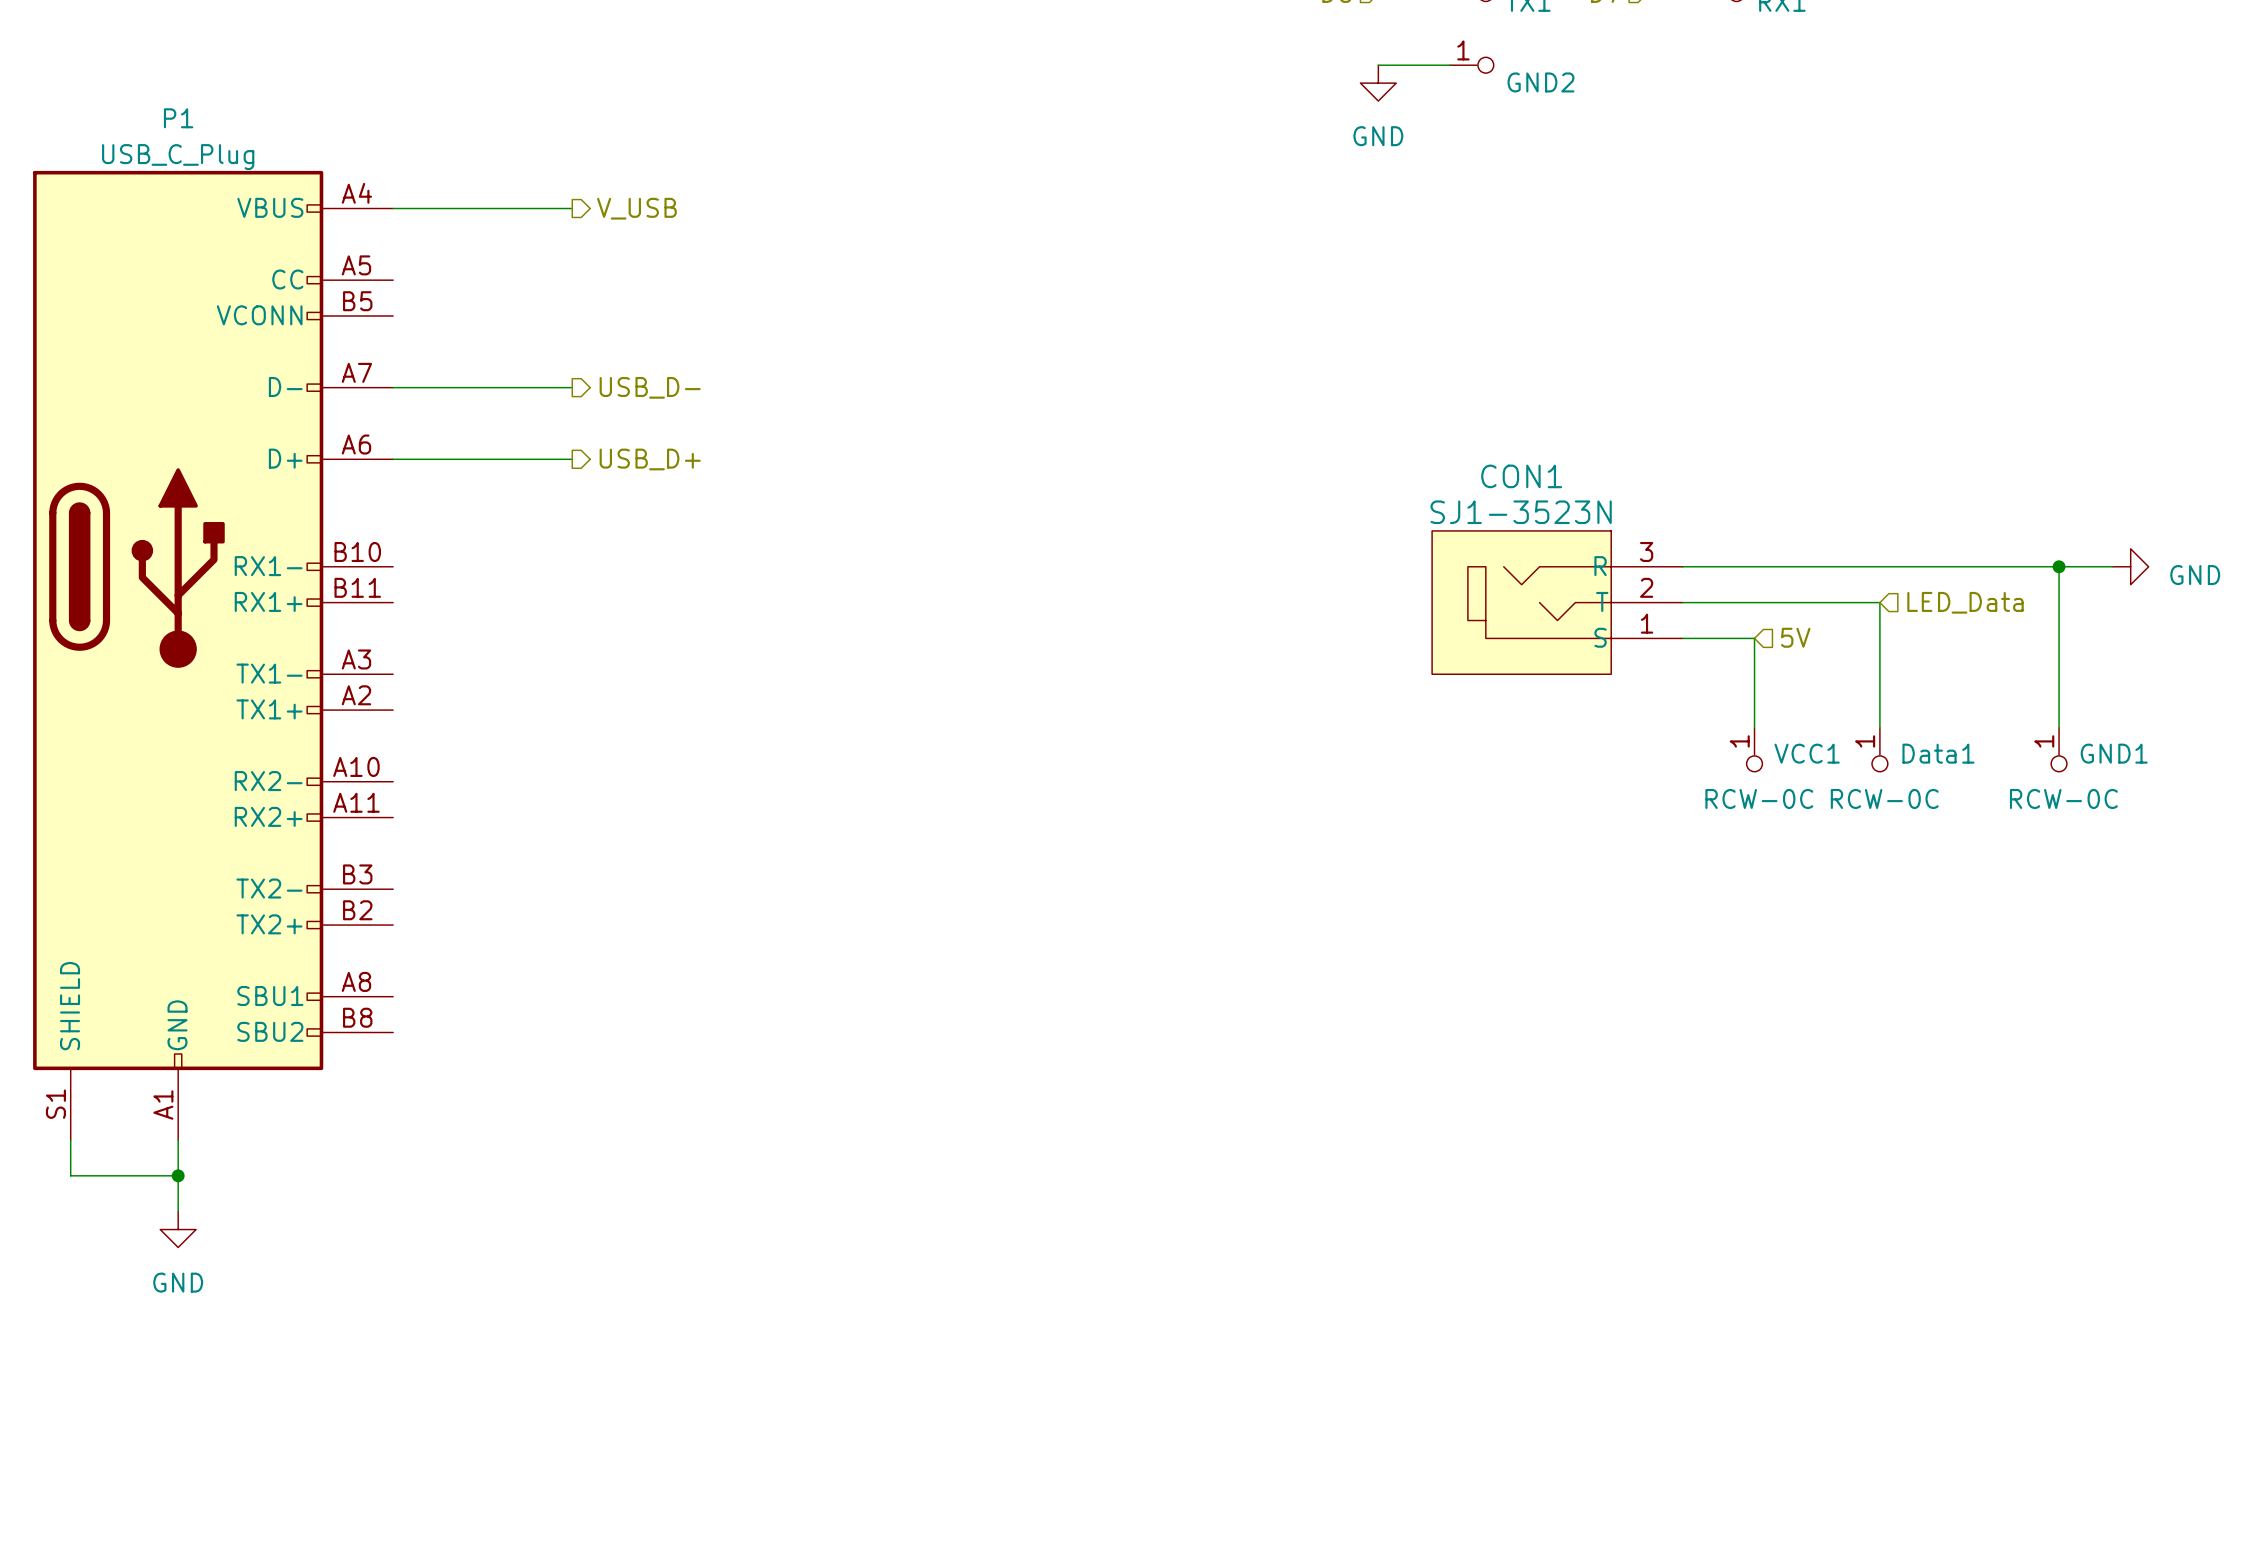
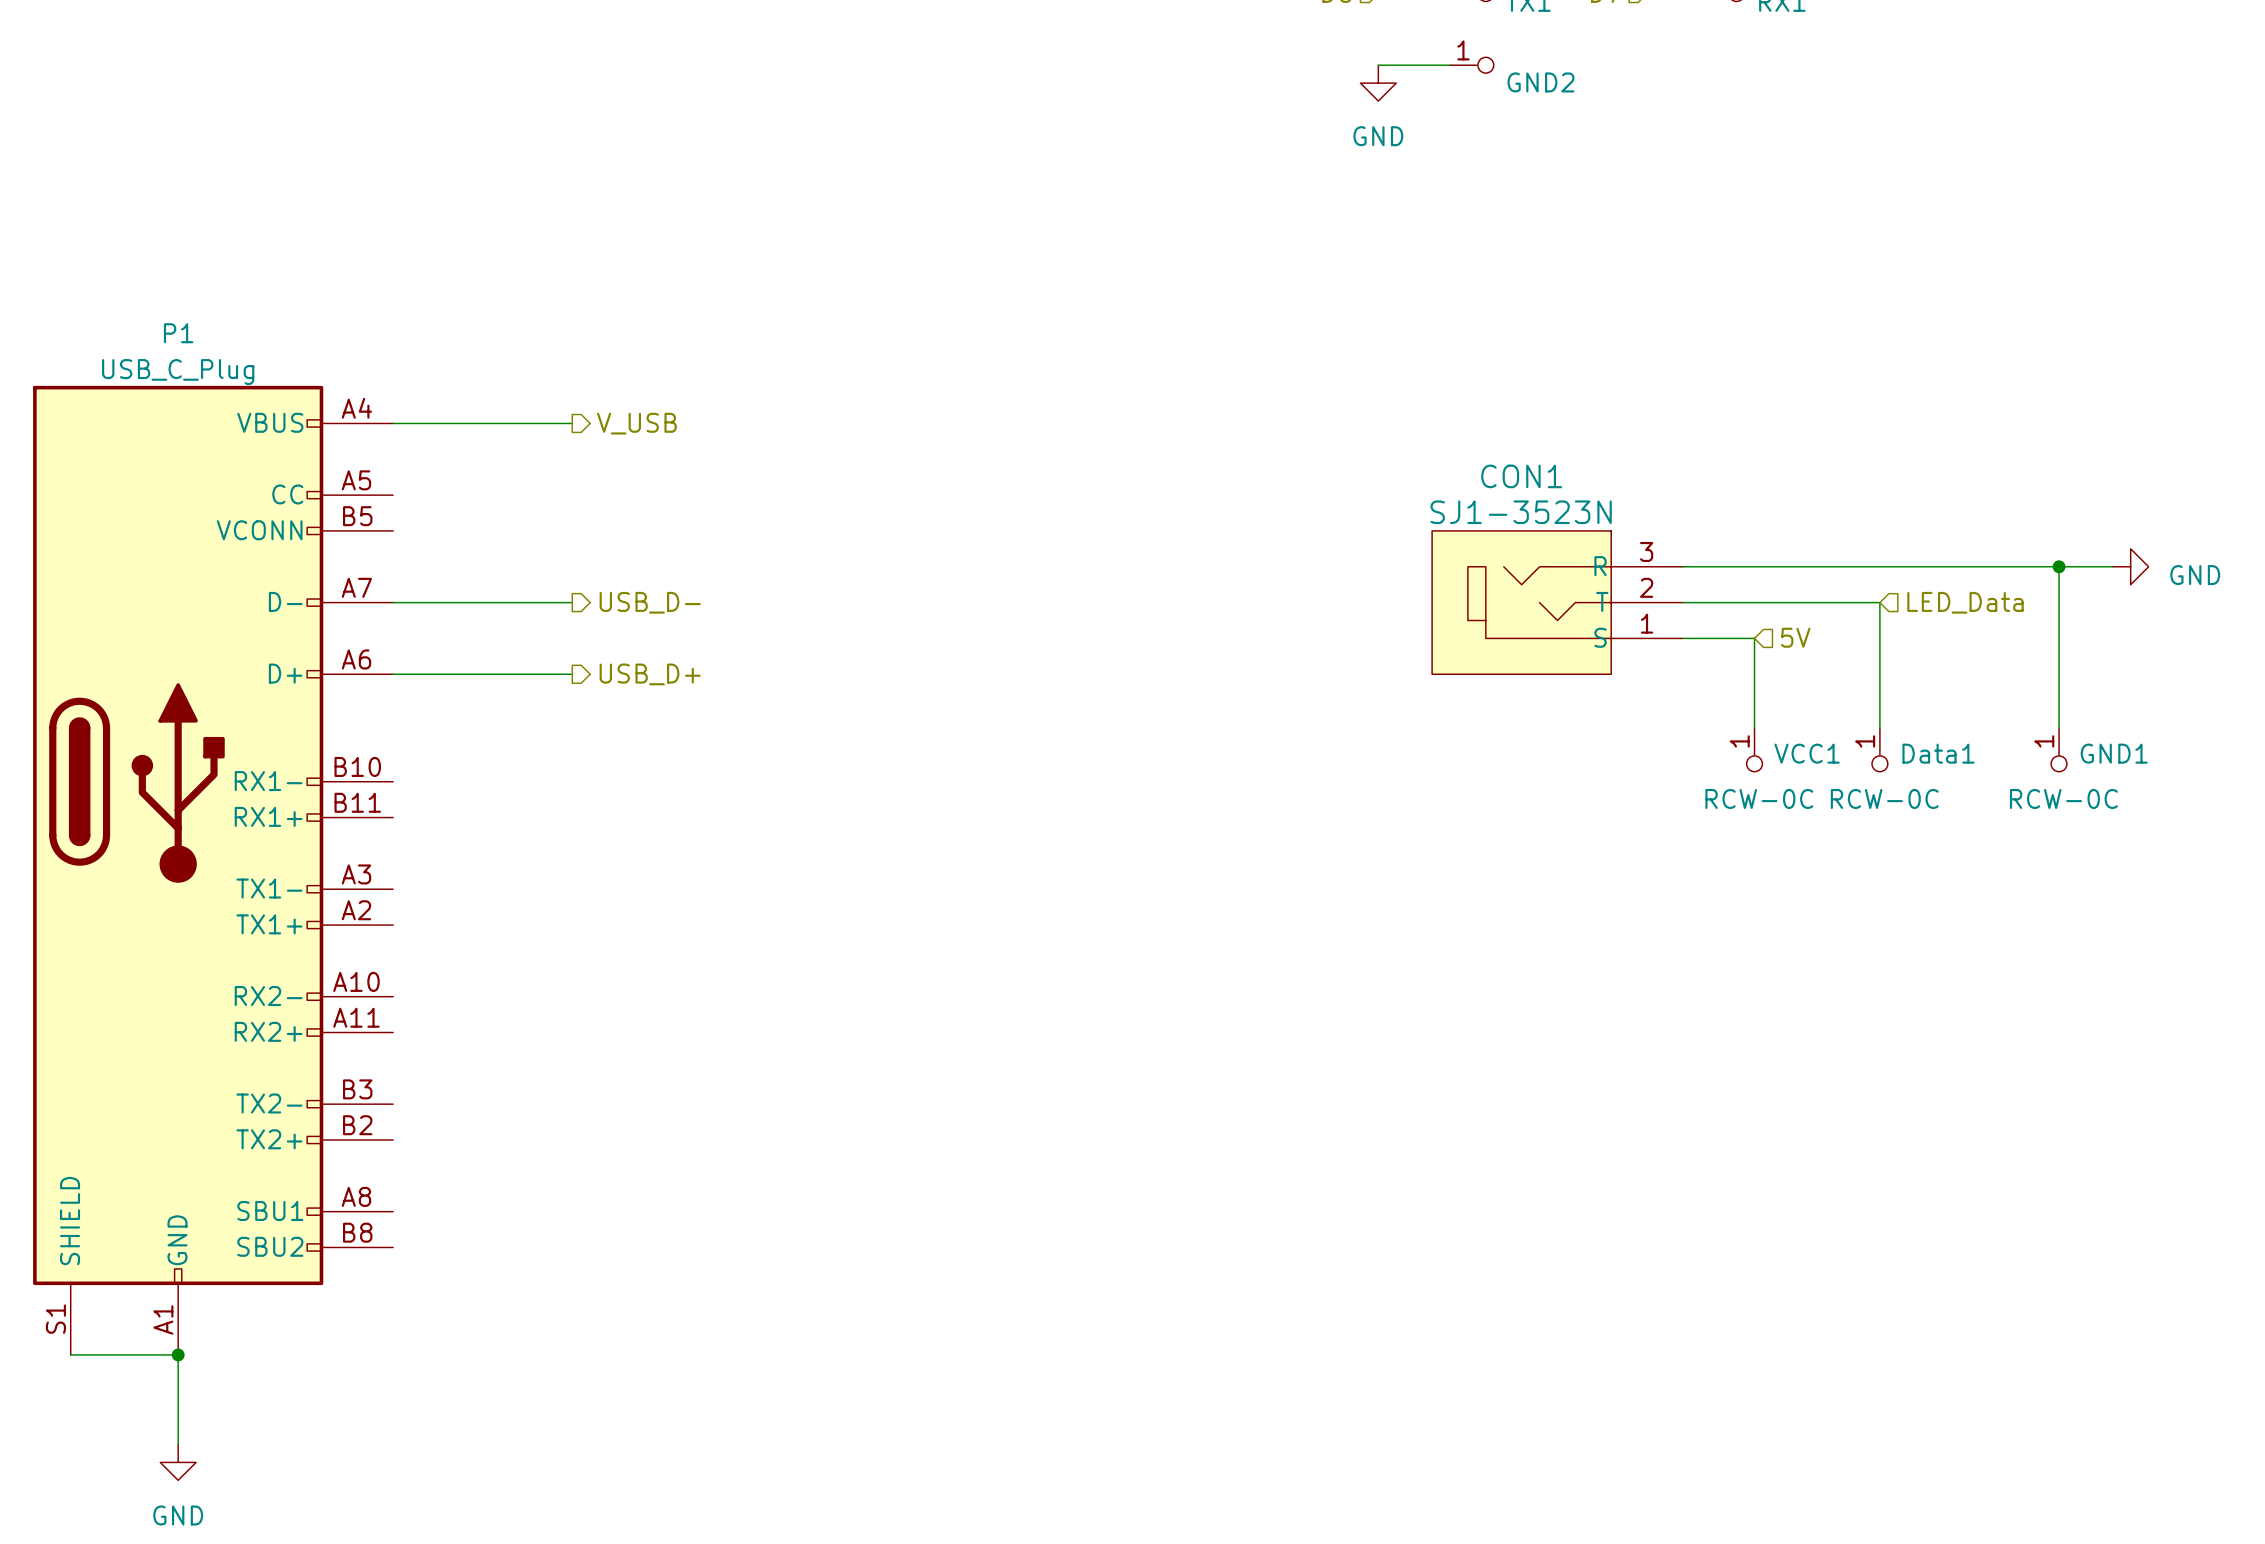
wire: (393, 208) (572, 208) -> (393, 423) (572, 423)
hierarchical label position: V_USB (636, 208) -> V_USB (636, 423)
wire: (393, 387) (572, 387) -> (393, 602) (572, 602)
hierarchical label position: USB_D- (650, 387) -> USB_D- (650, 602)
wire: (393, 459) (572, 459) -> (393, 674) (572, 674)
hierarchical label position: USB_D+ (650, 459) -> USB_D+ (650, 674)
P1 position: (213, 655) -> (213, 870)
junction: (178, 1175) -> none
power symbol position: GND (178, 1229) -> GND (178, 1462)
wire: none -> (70, 1354) (178, 1354) (178, 1444)
junction: none -> (178, 1354)

